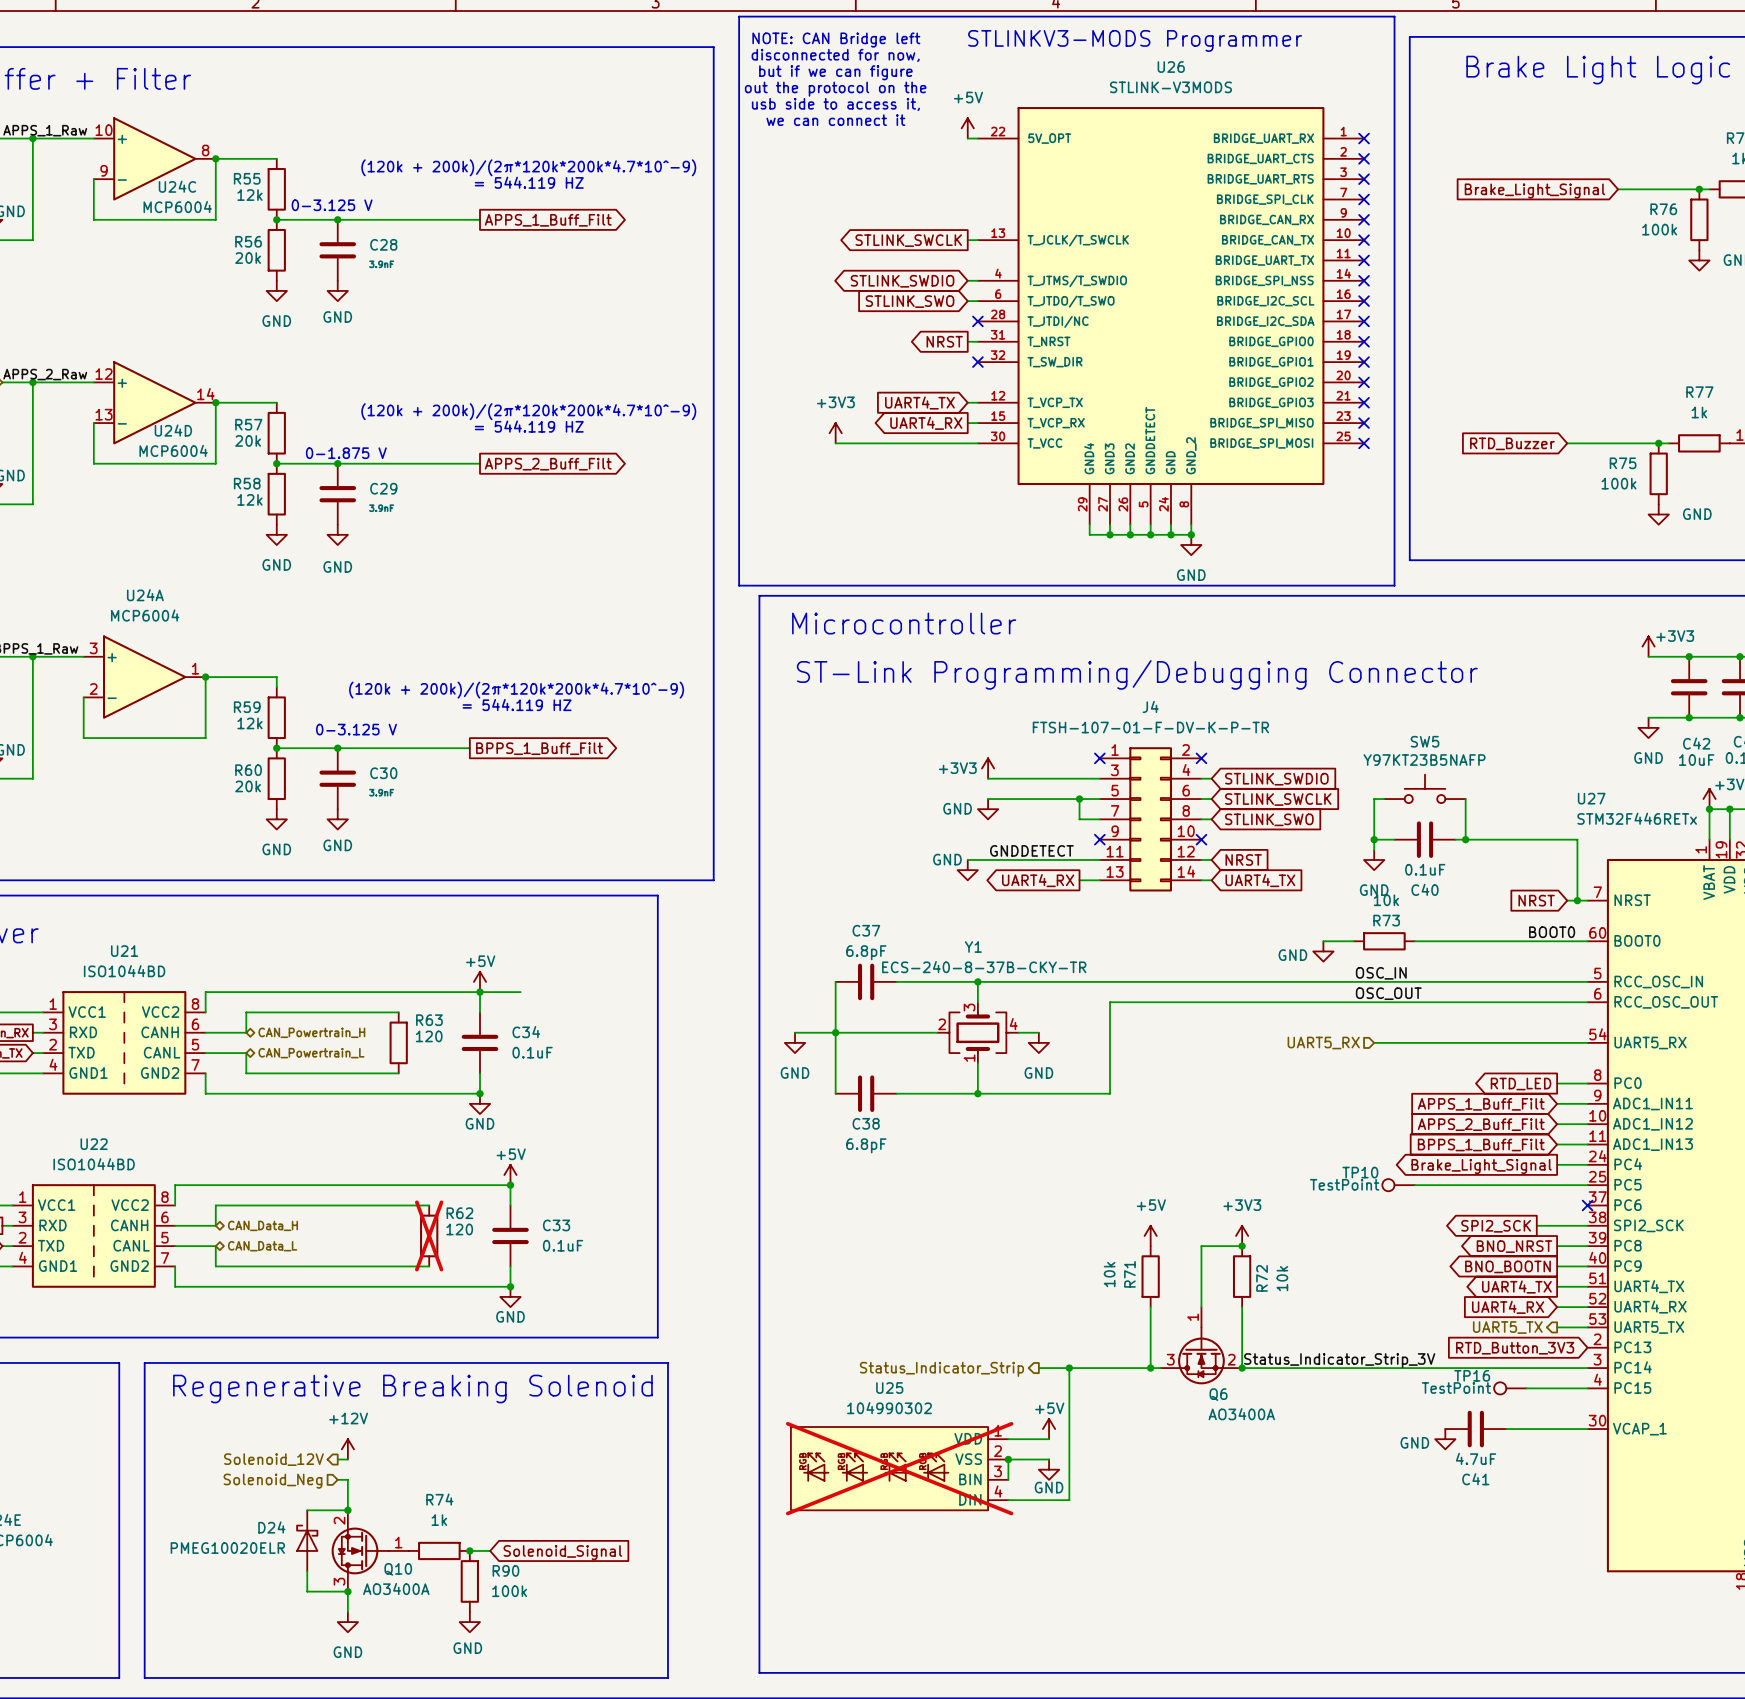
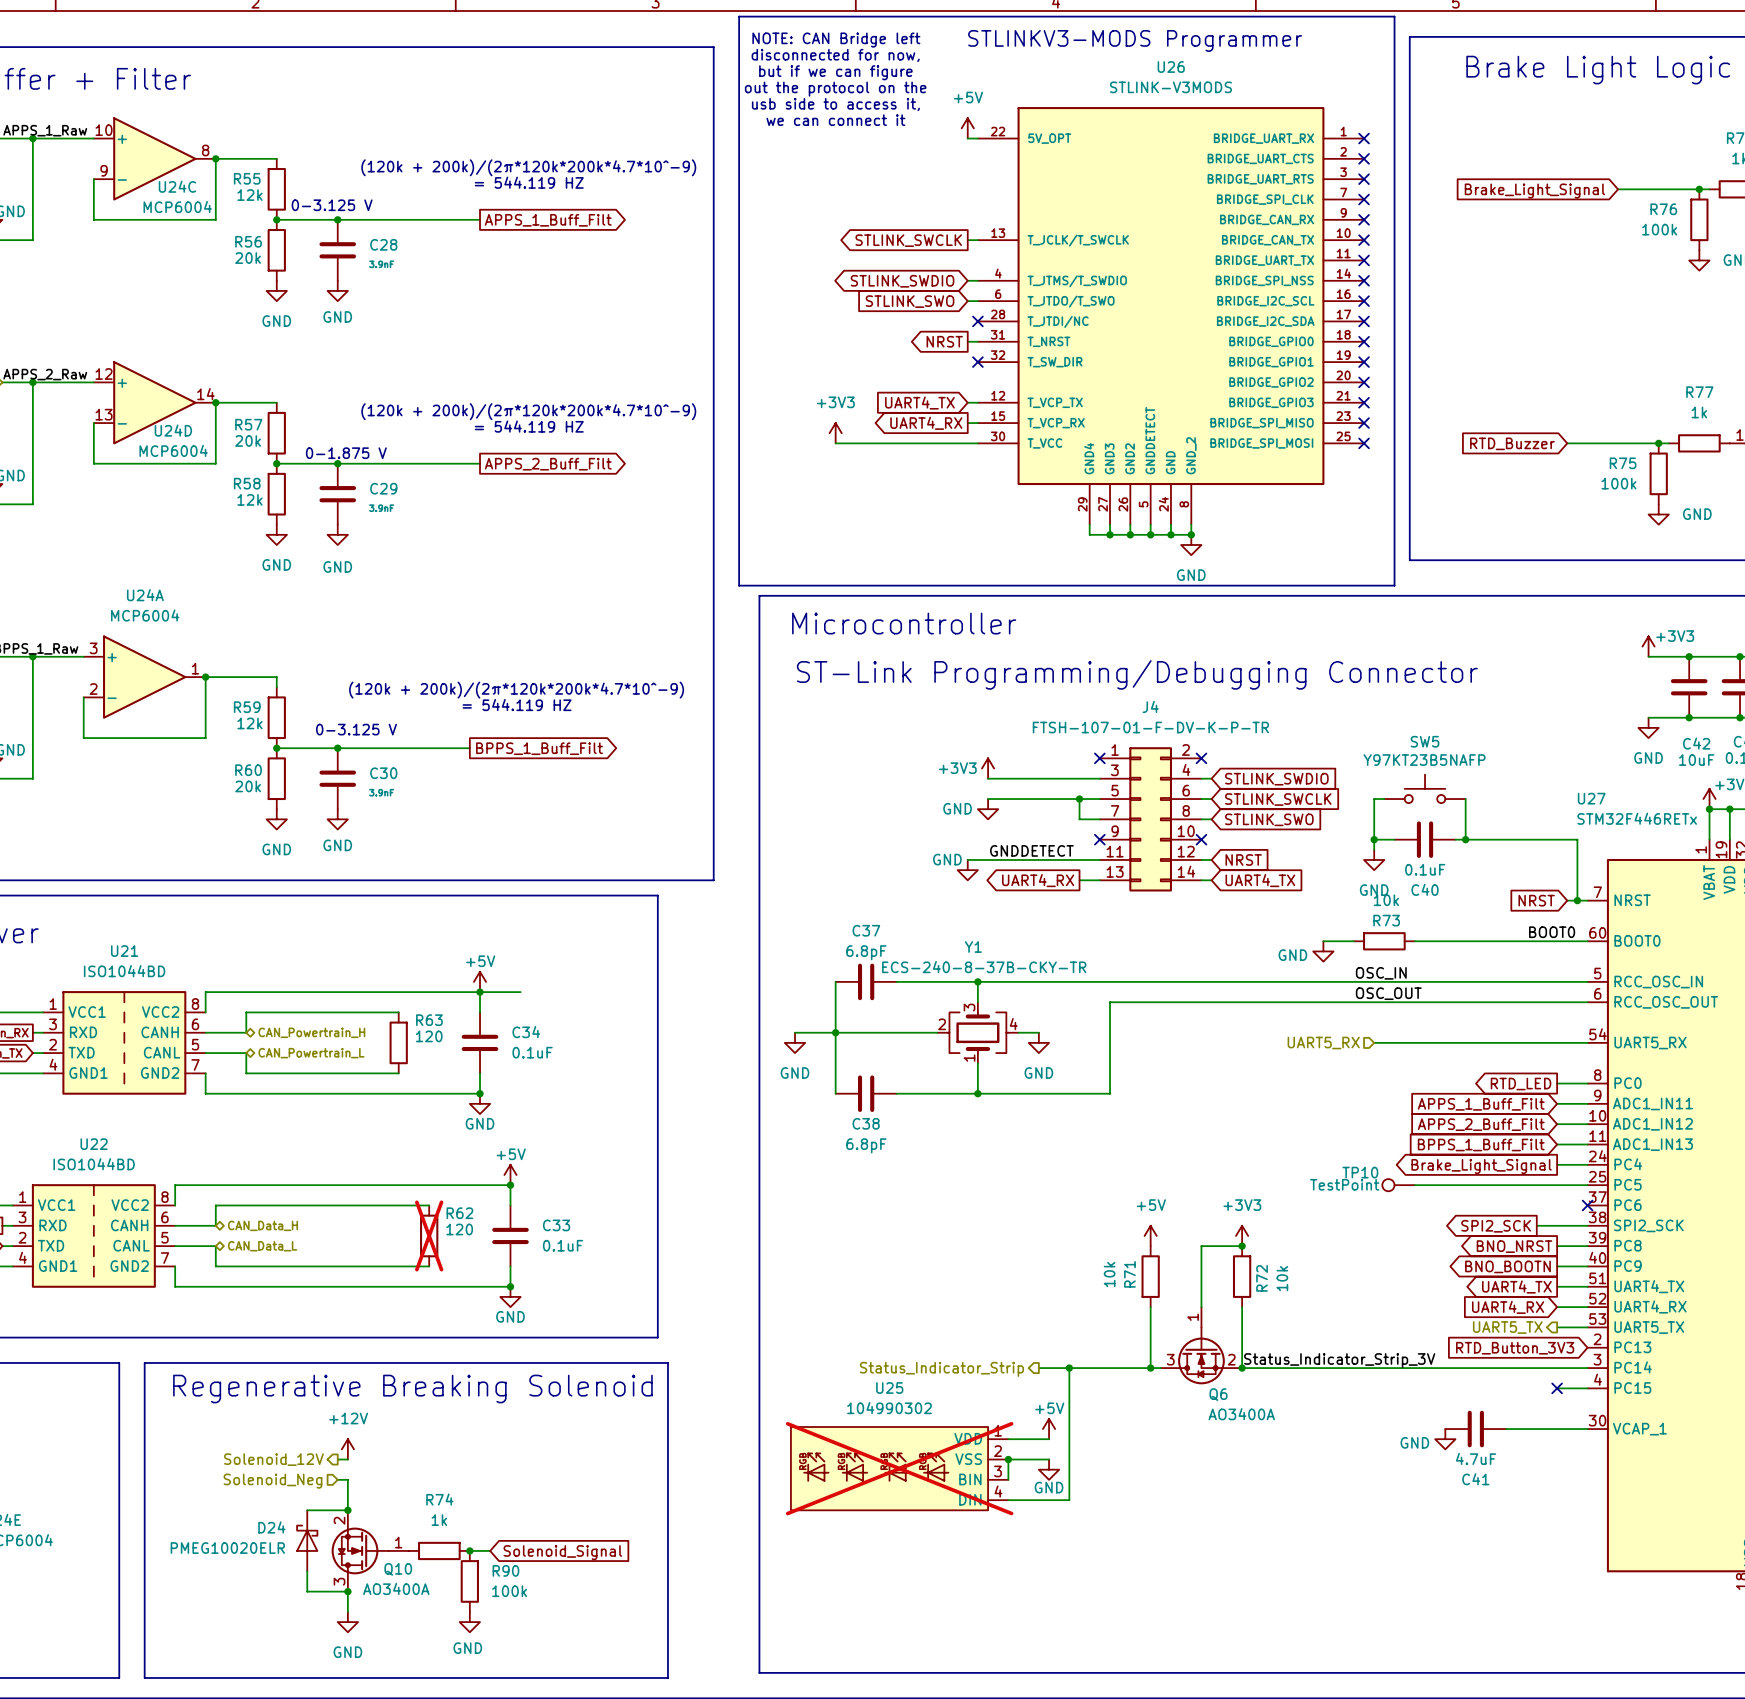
TP16: TestPoint (1510, 1388) -> none
wire: (1526, 1388) (1557, 1388) -> none
no-connect mark: none -> (1557, 1388)

